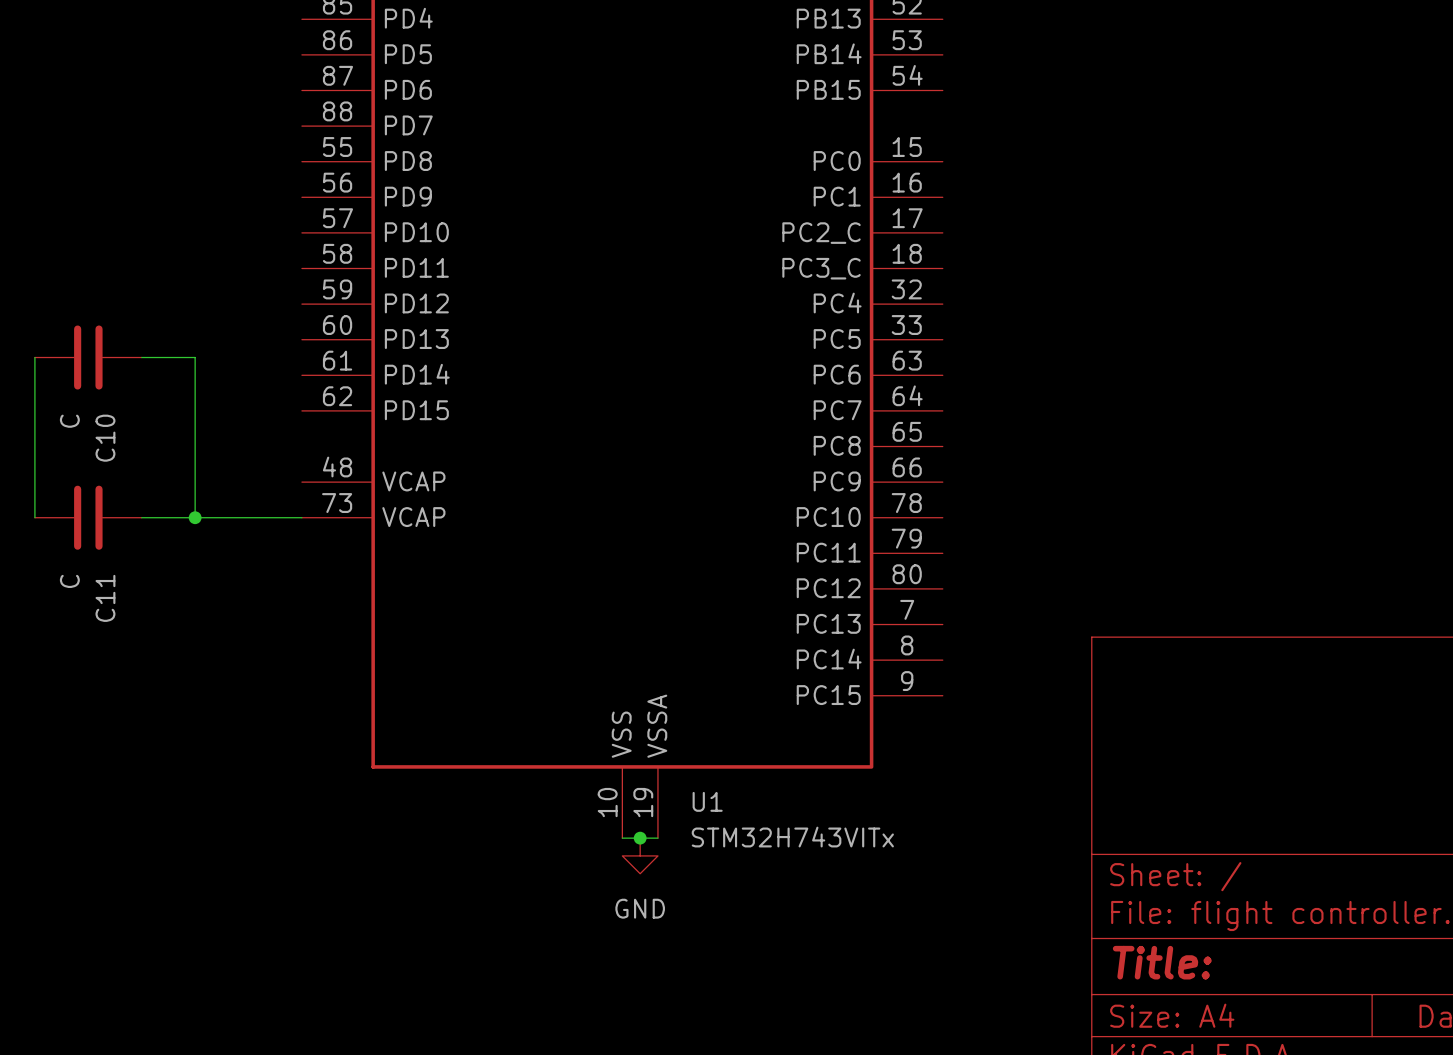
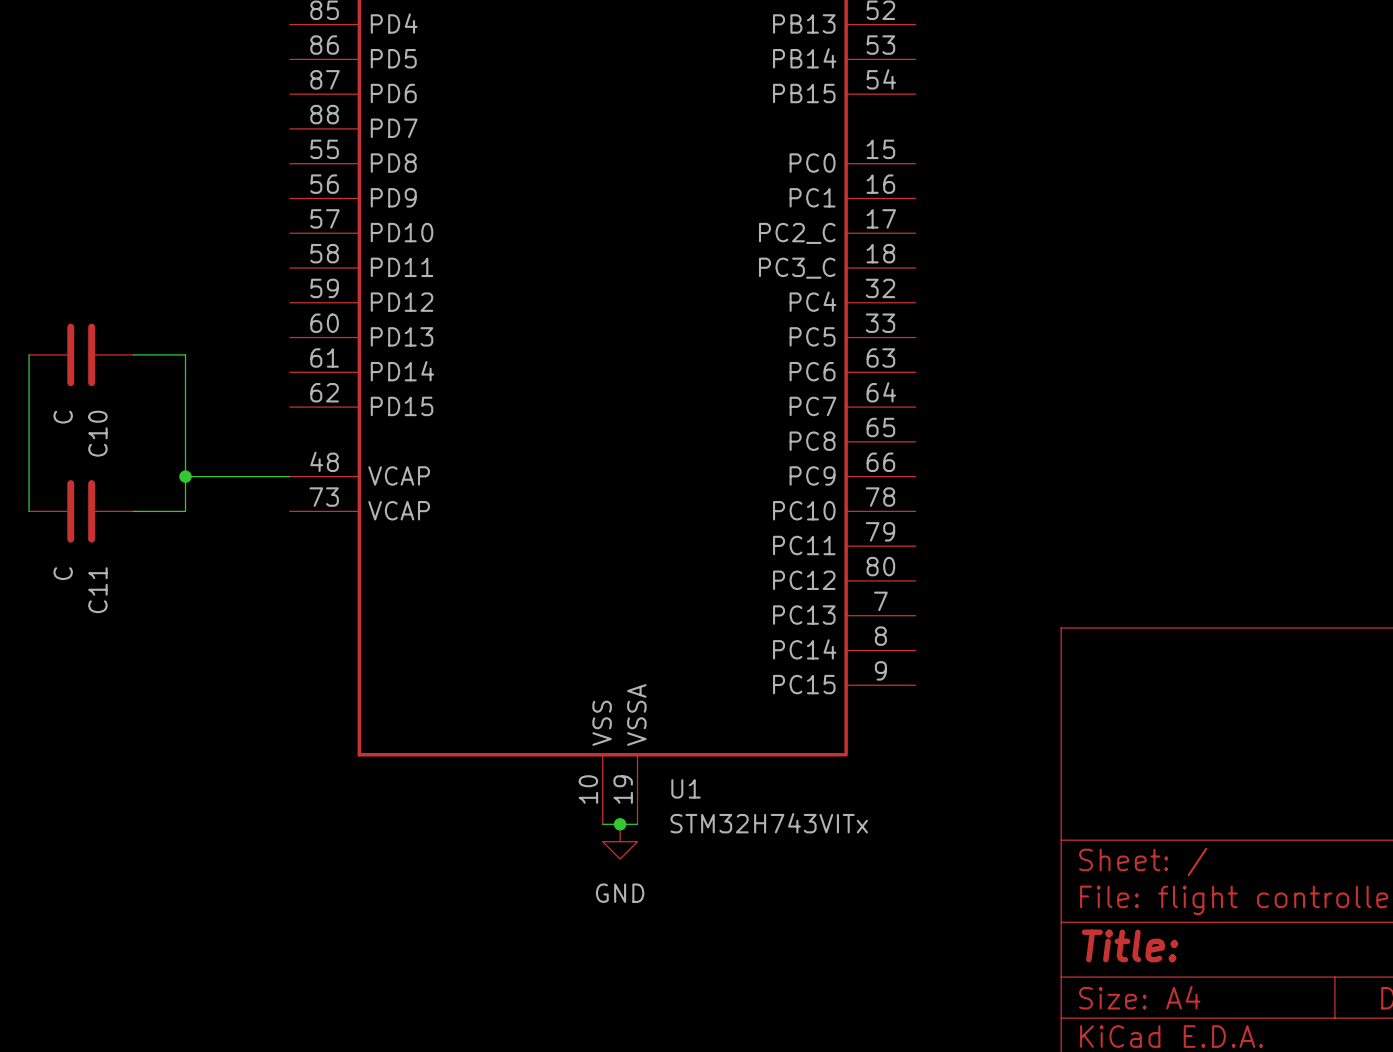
wire: (195, 517) (301, 517) -> (185, 476) (289, 476)
junction position: (195, 517) -> (185, 476)

